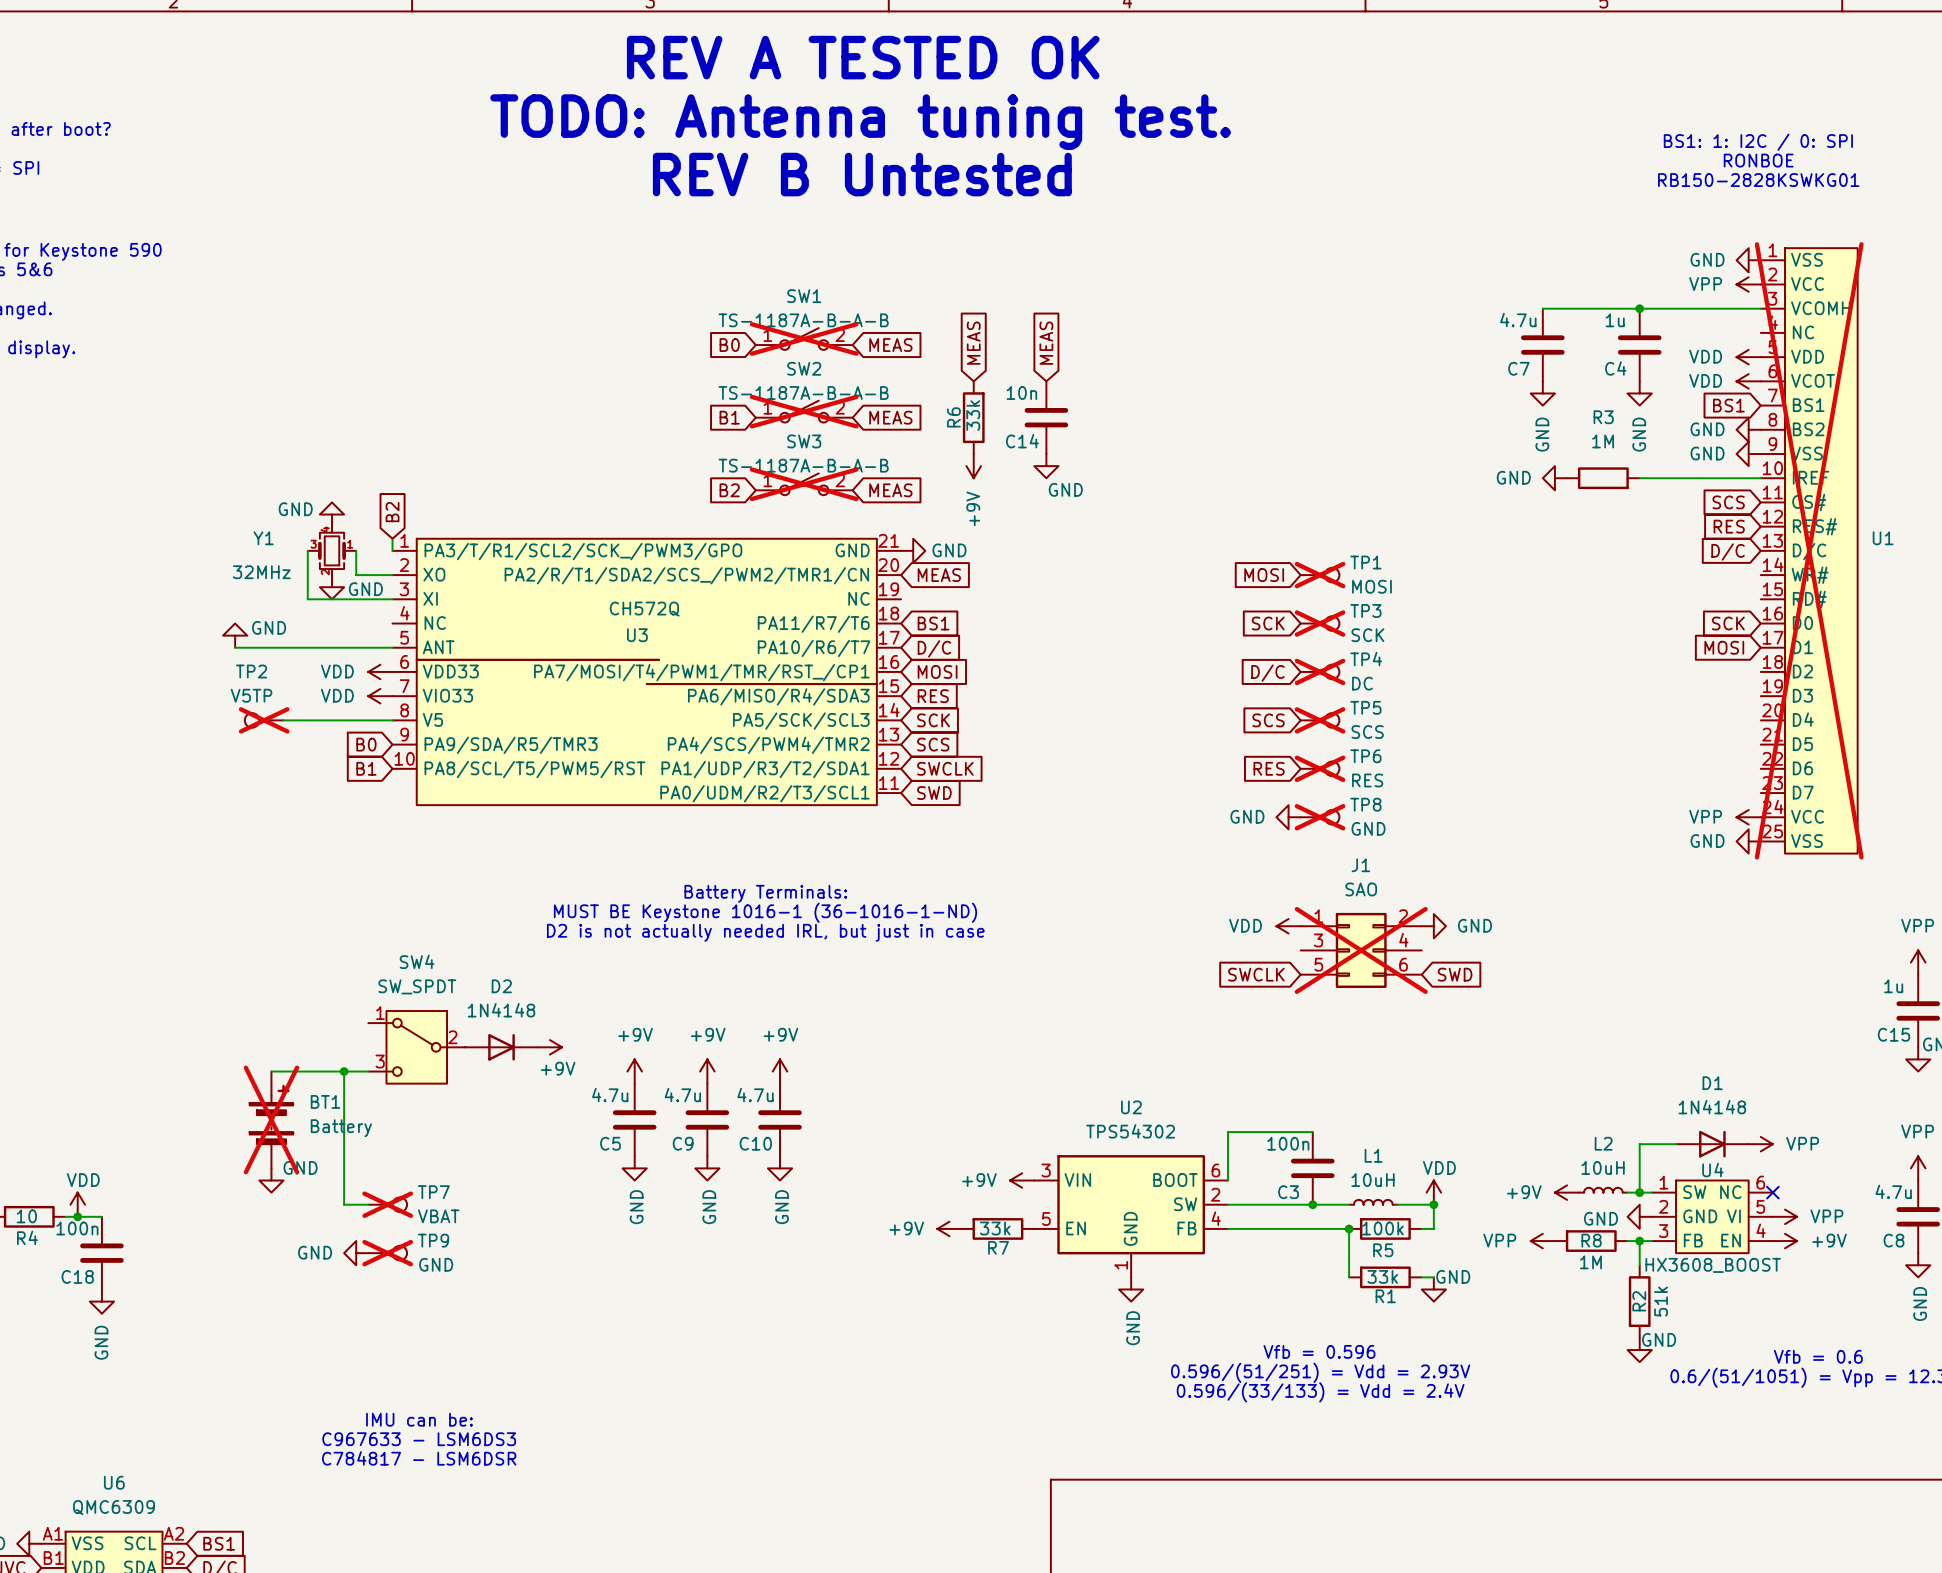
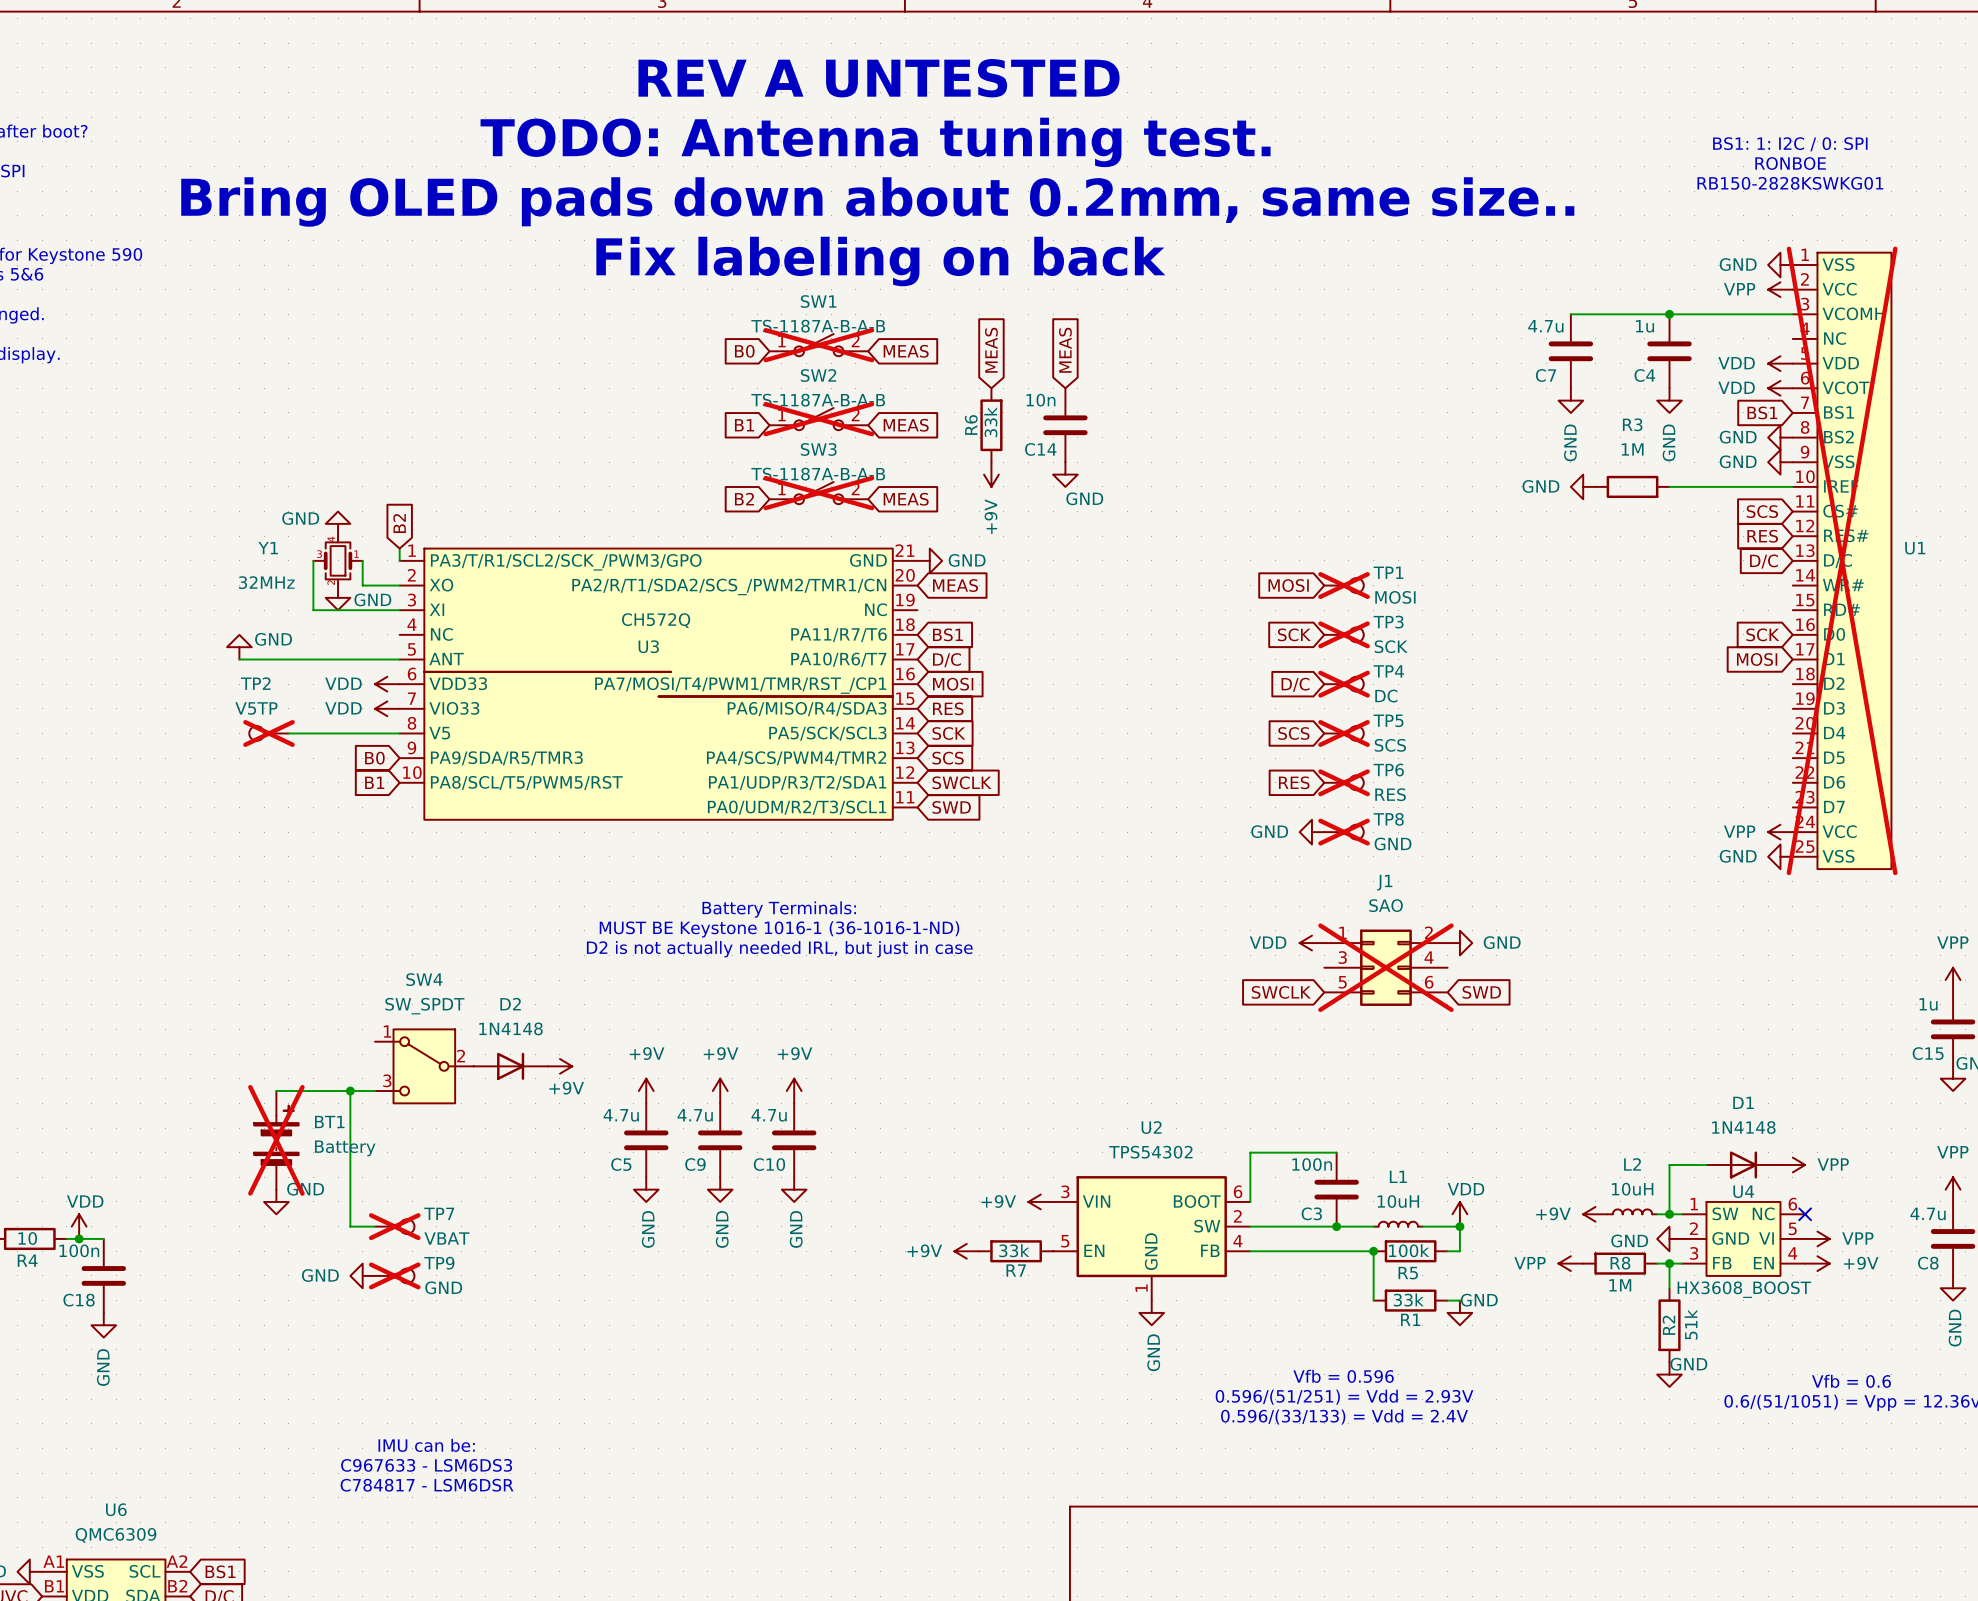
text: REV A TESTED OK (863, 57) -> REV A UNTESTED (879, 78)
text position: TODO: Antenna tuning test. (860, 122) -> TODO: Antenna tuning test. (875, 142)
text: REV B Untested (862, 174) -> none
text: none -> Bring OLED pads down about 0.2mm, same size.. (877, 201)
text: none -> Fix labeling on back (880, 261)

